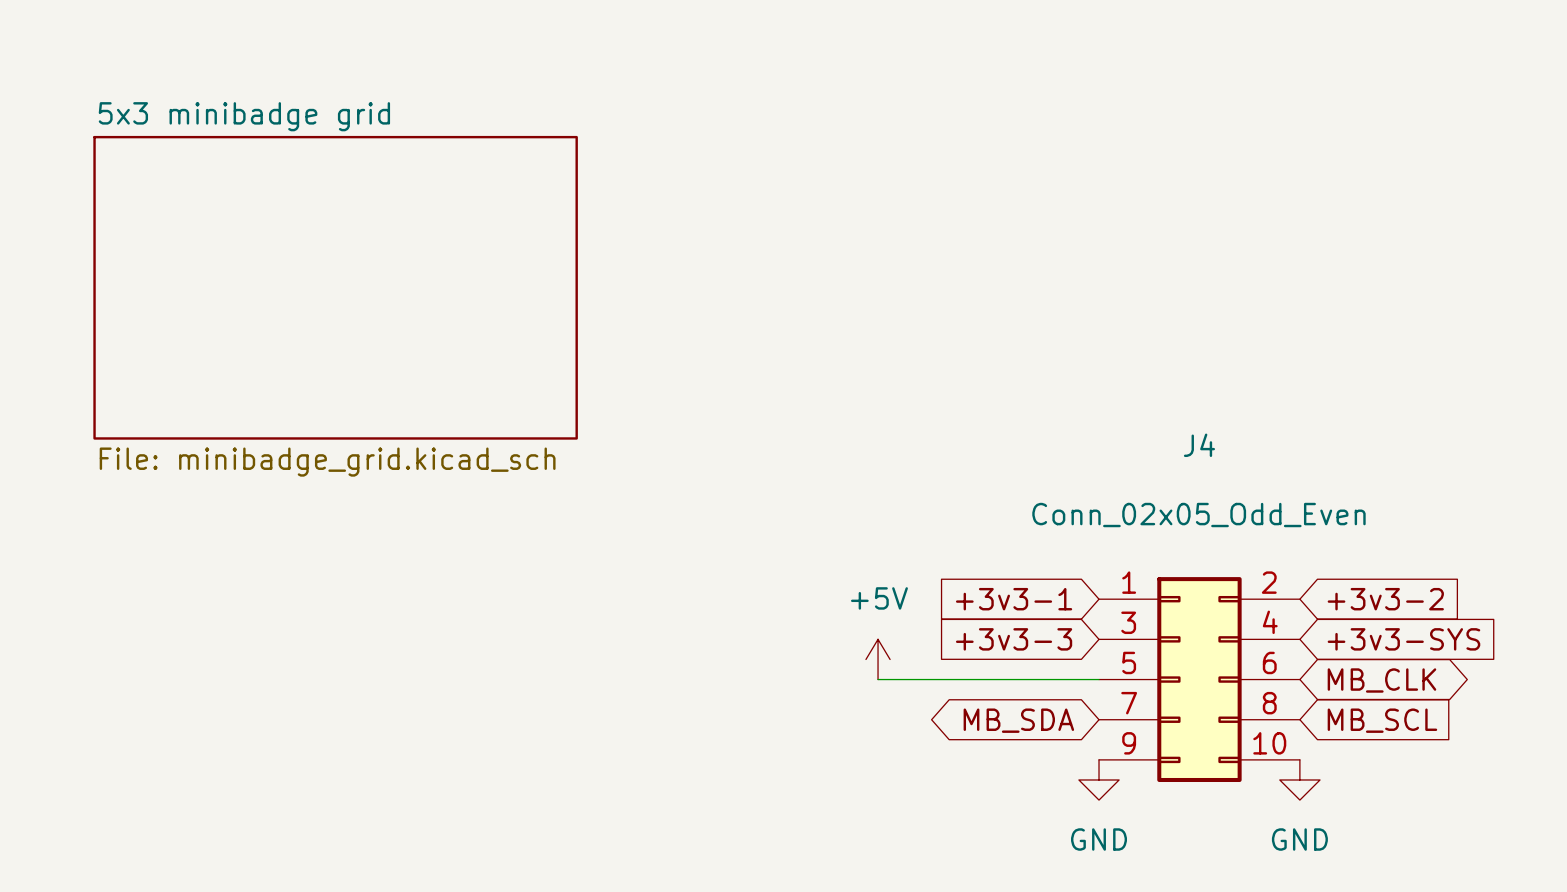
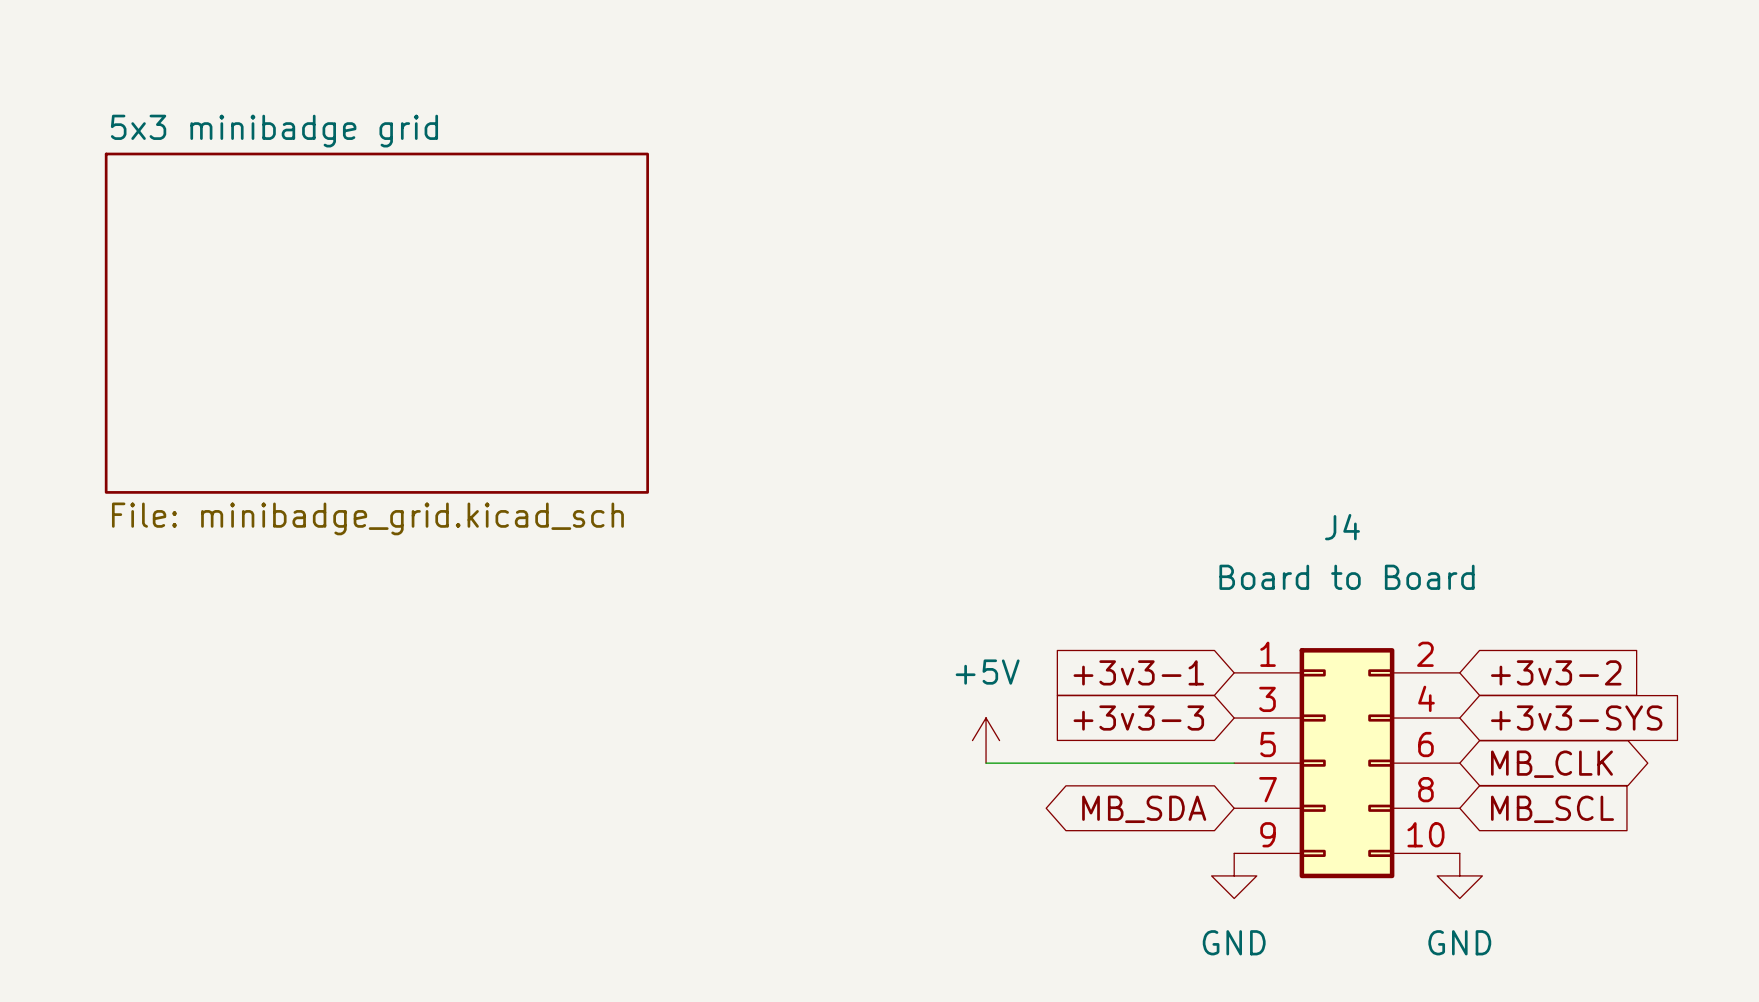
J4 name position: J4 (1199, 445) -> J4 (1342, 527)
J4 value: Conn_02x05_Odd_Even (1198, 515) -> Board to Board (1347, 577)

